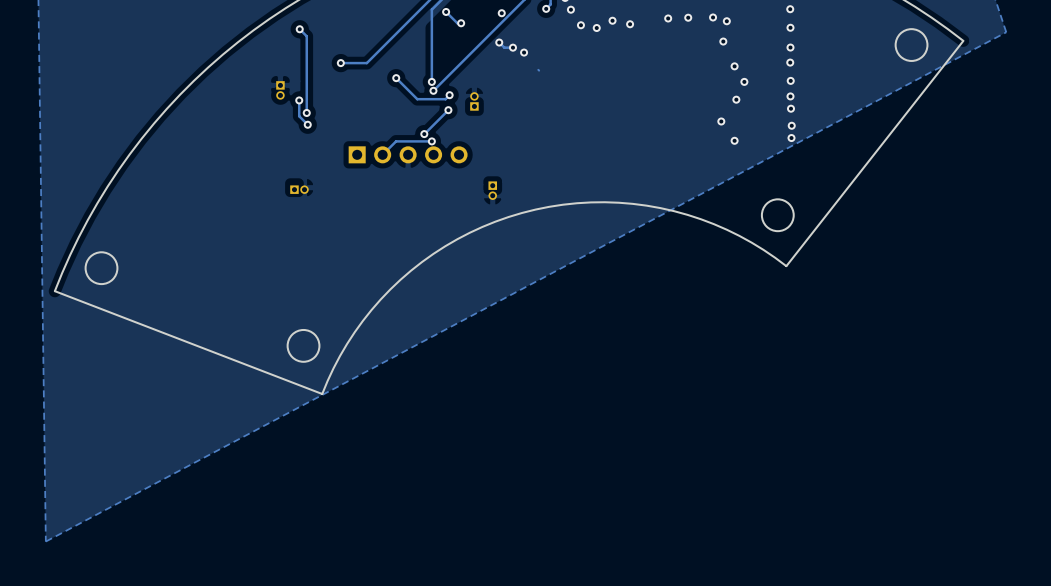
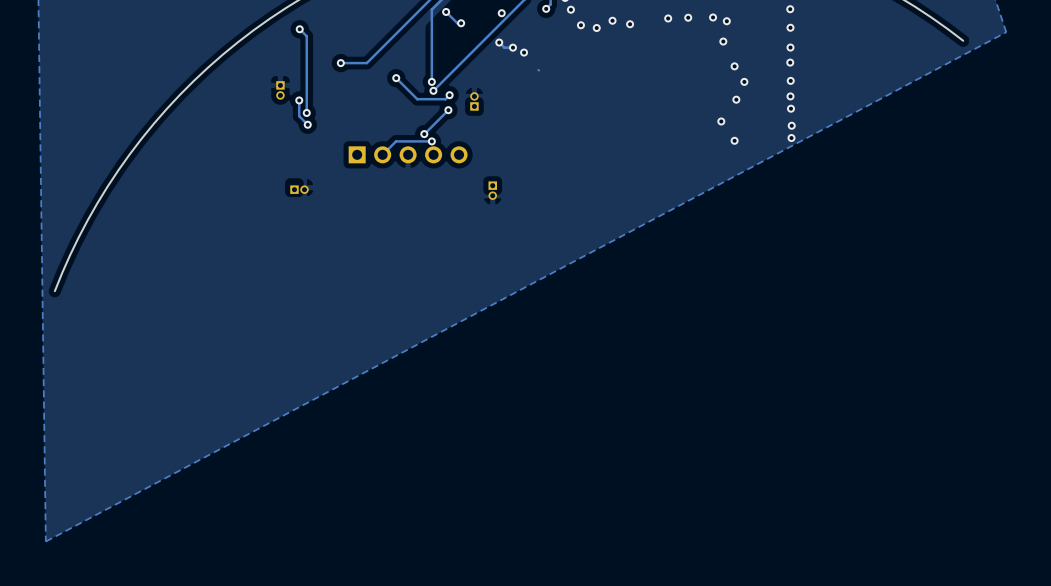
round board edge: [894, 28, 929, 62] -> none
board edge: (963, 40) (786, 266) -> none
round board edge: [760, 198, 795, 233] -> none
round board edge: [84, 251, 119, 286] -> none
board edge: (786, 266) (763, 249) (726, 229) (700, 219) (660, 208) (632, 203) (590, 202) (563, 204) (522, 212) (495, 221) (457, 239) (422, 261) (400, 279) (371, 309) (354, 332) (333, 368) (322, 394) (54, 291) -> none
round board edge: [286, 328, 321, 363] -> none

